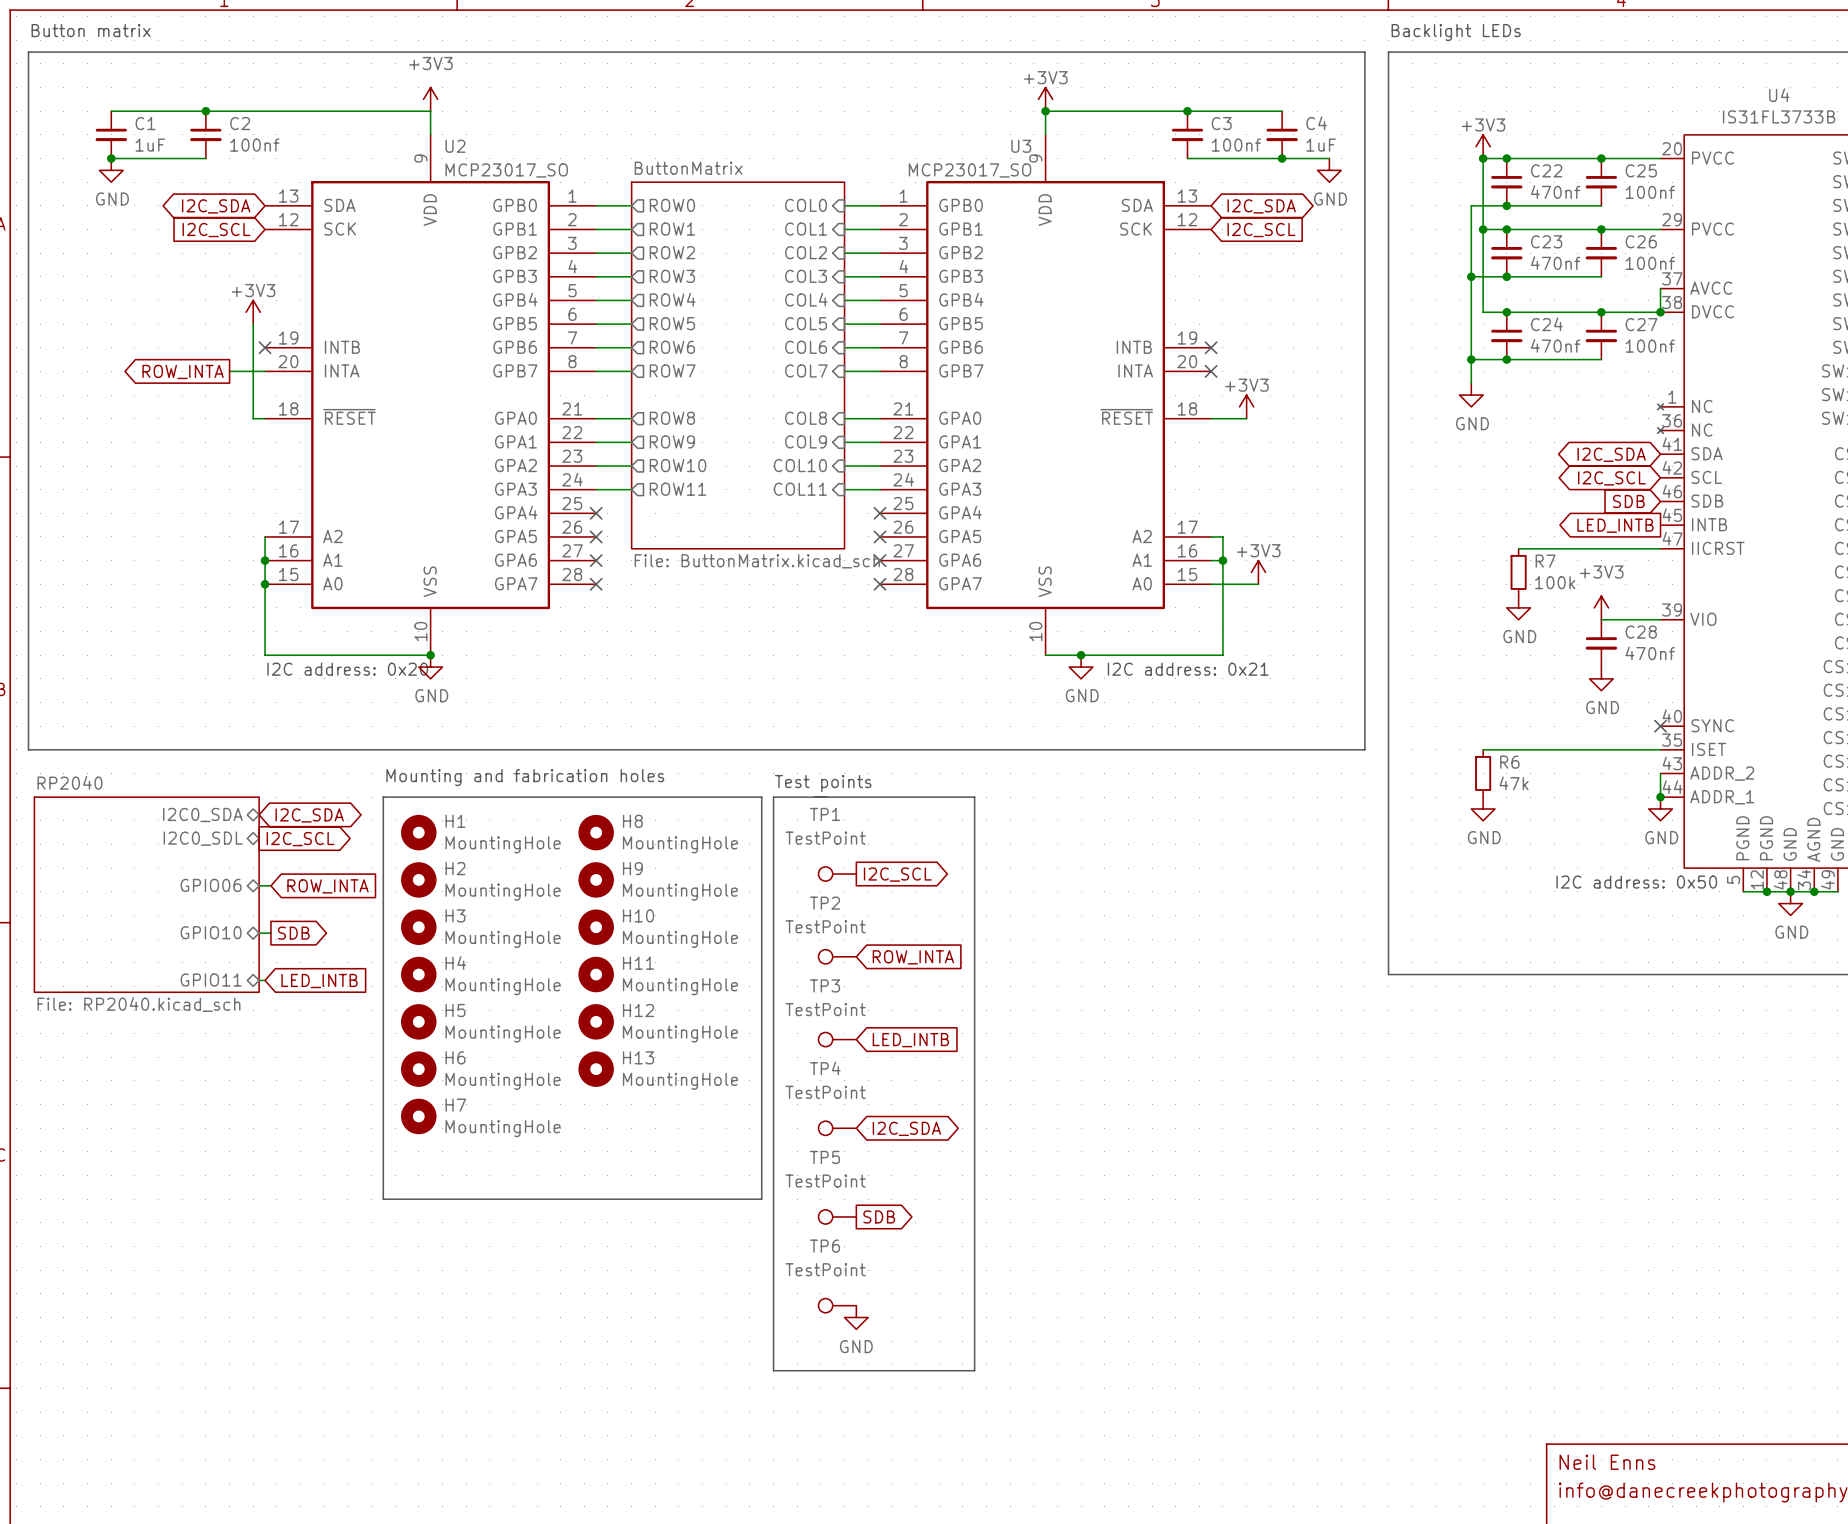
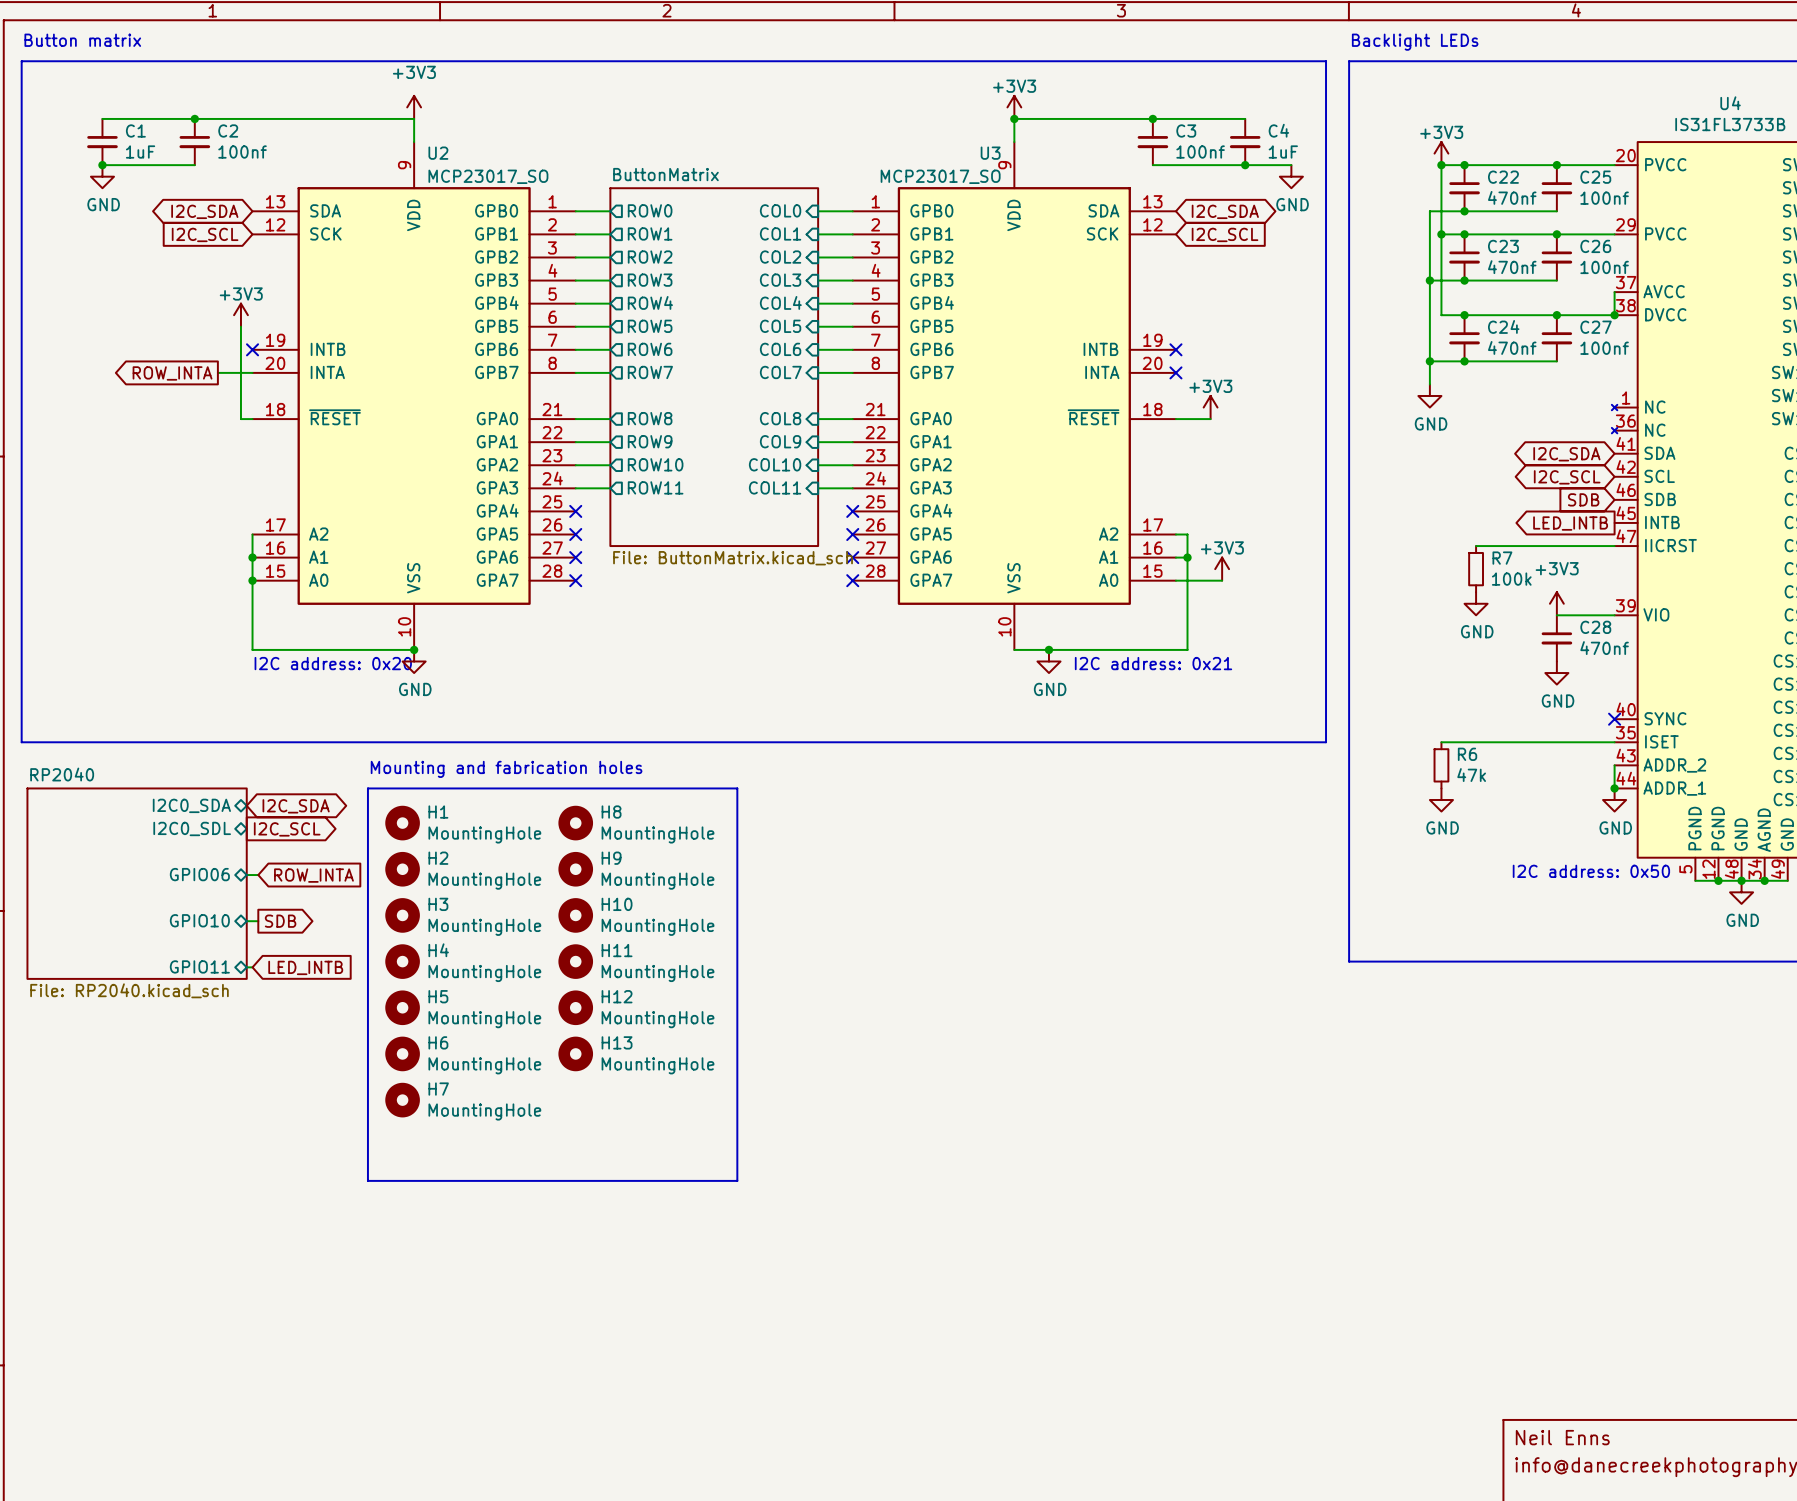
text: Test points (823, 783) -> none
line: (773, 797) (773, 1370) (974, 1370) (974, 797) (773, 797) -> none
TP1: TestPoint (837, 874) -> none
global label: I2C_SCL (897, 874) -> none
TP2: TestPoint (837, 956) -> none
global label: ROW_INTA (913, 957) -> none
TP3: TestPoint (837, 1039) -> none
global label: LED_INTB (910, 1040) -> none
TP4: TestPoint (837, 1128) -> none
global label: I2C_SDA (906, 1128) -> none
TP5: TestPoint (837, 1216) -> none
global label: SDB (879, 1216) -> none
TP6: TestPoint (837, 1305) -> none
power symbol: GND (856, 1317) -> none

